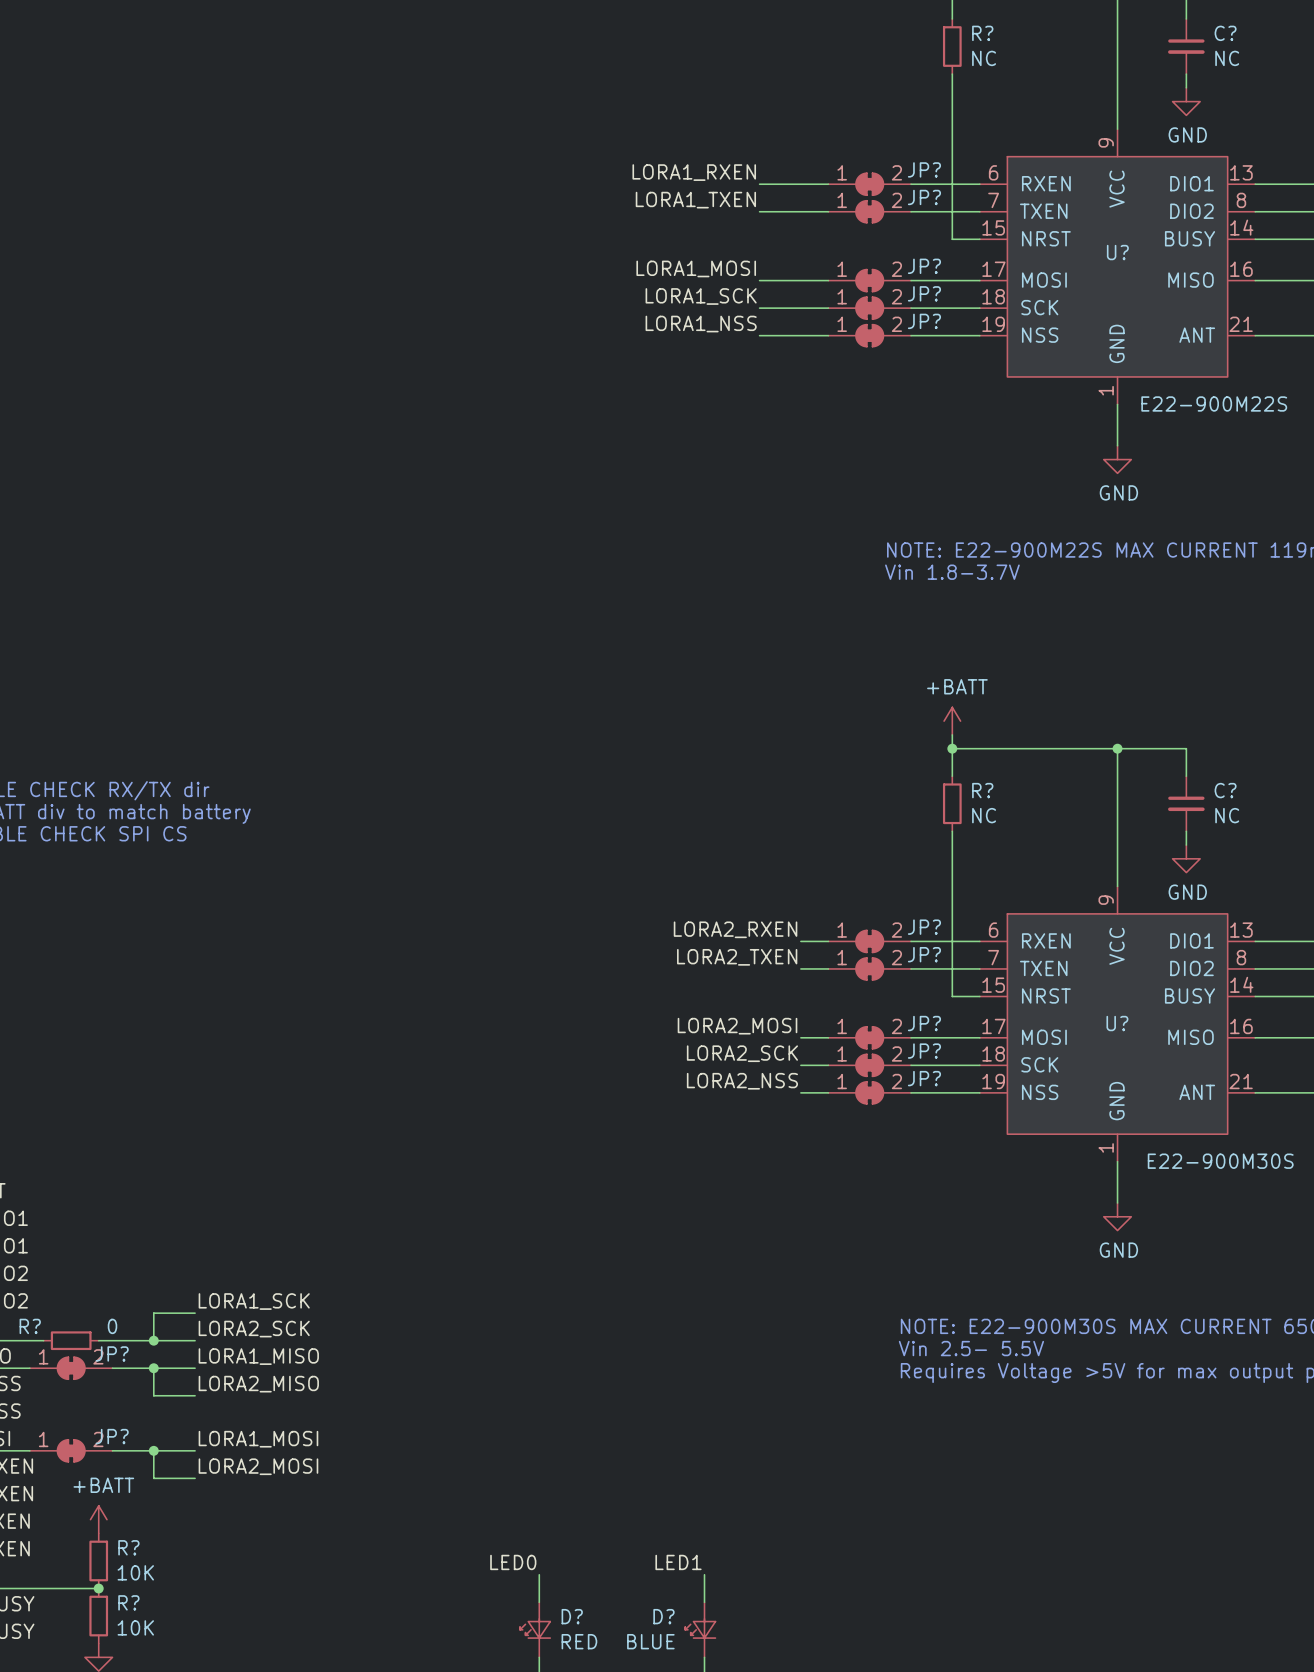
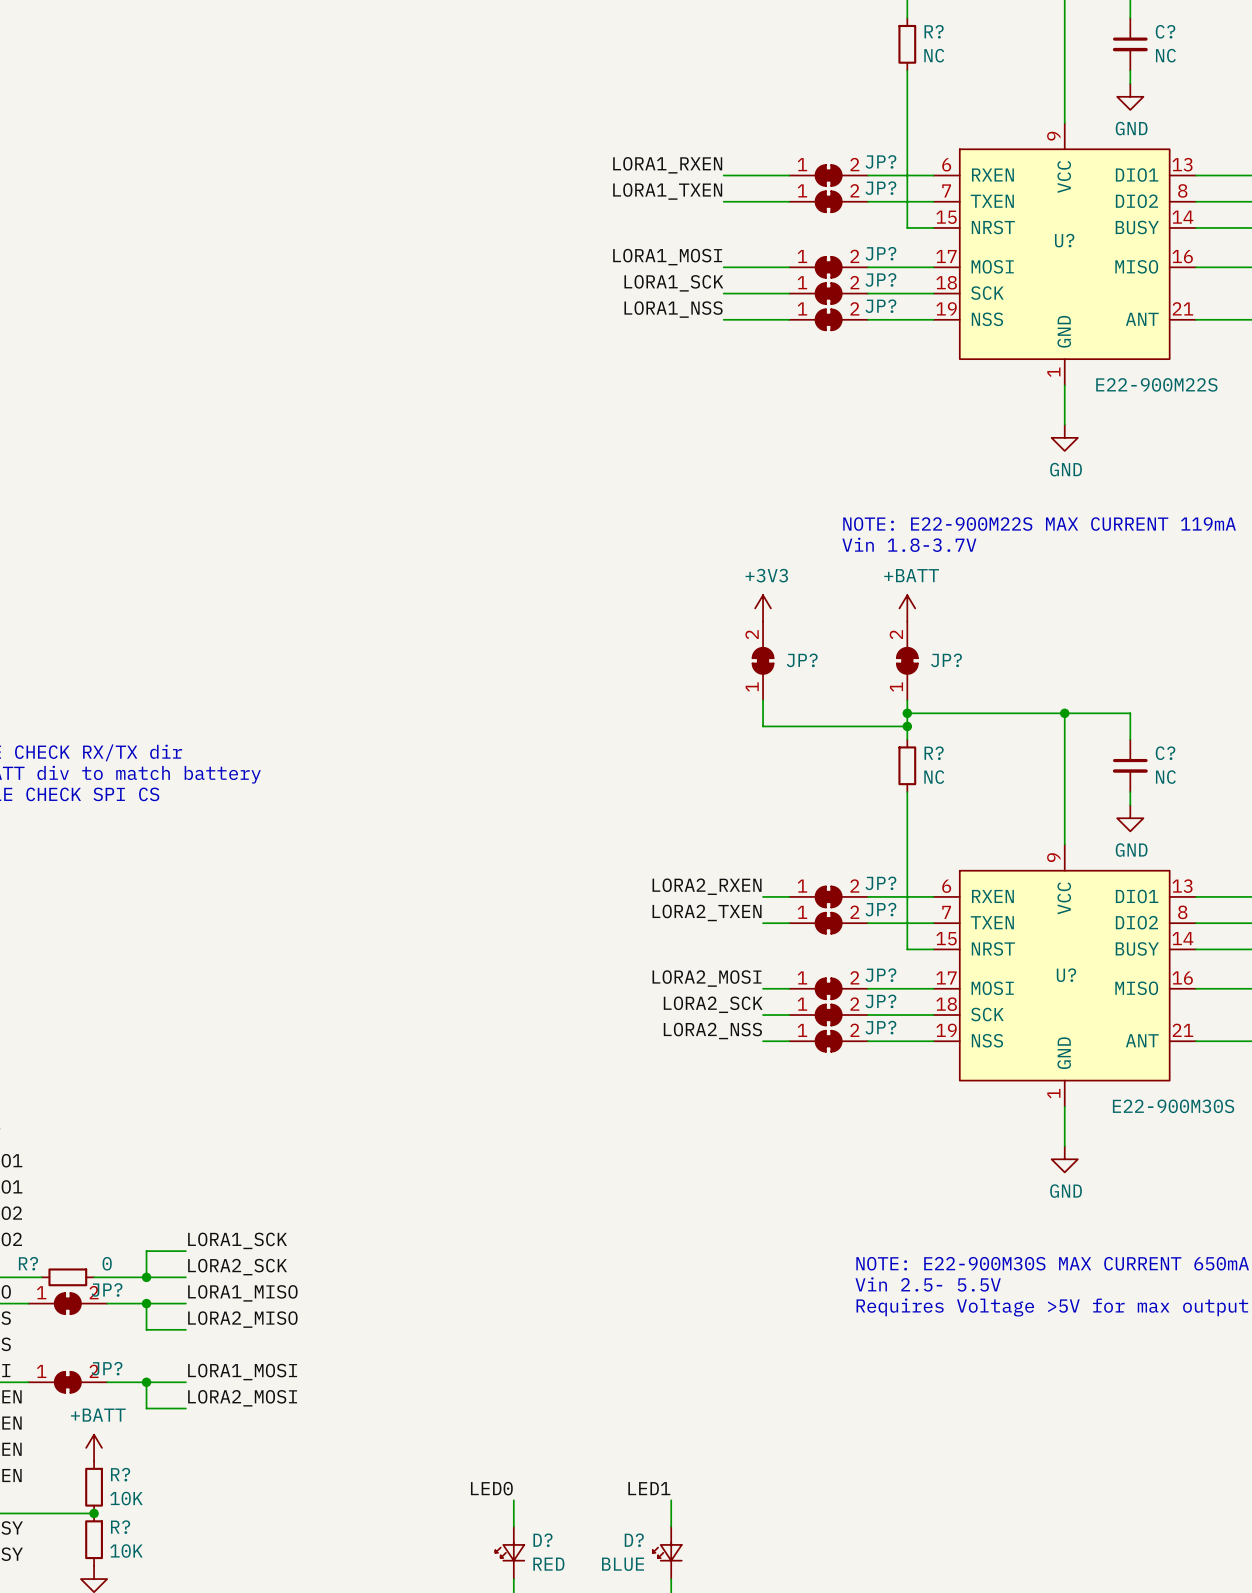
power symbol: none -> +3V3 (763, 608)
JP?: none -> (763, 660)
JP?: none -> (907, 660)
power symbol position: +BATT (952, 721) -> +BATT (907, 608)
wire: none -> (763, 700) (763, 726) (907, 726)
junction: none -> (907, 726)

